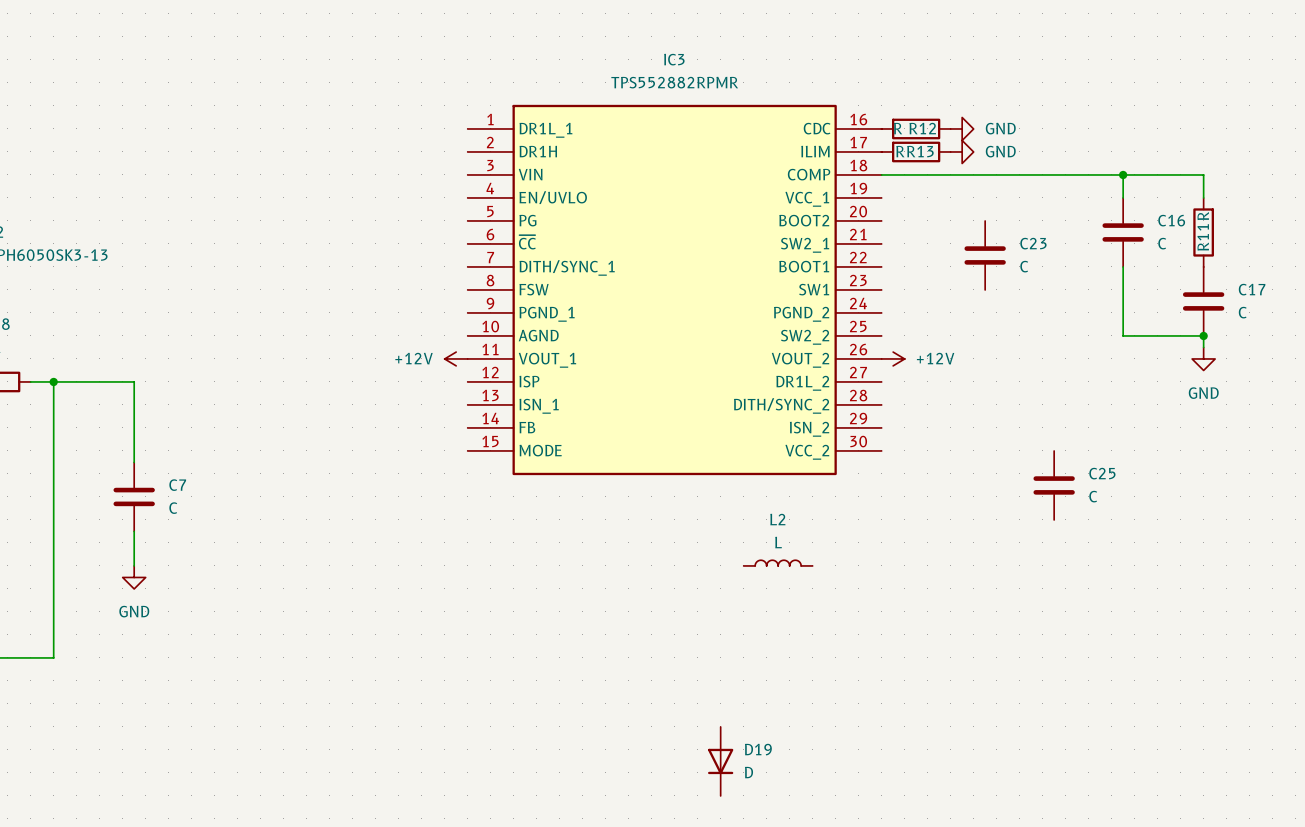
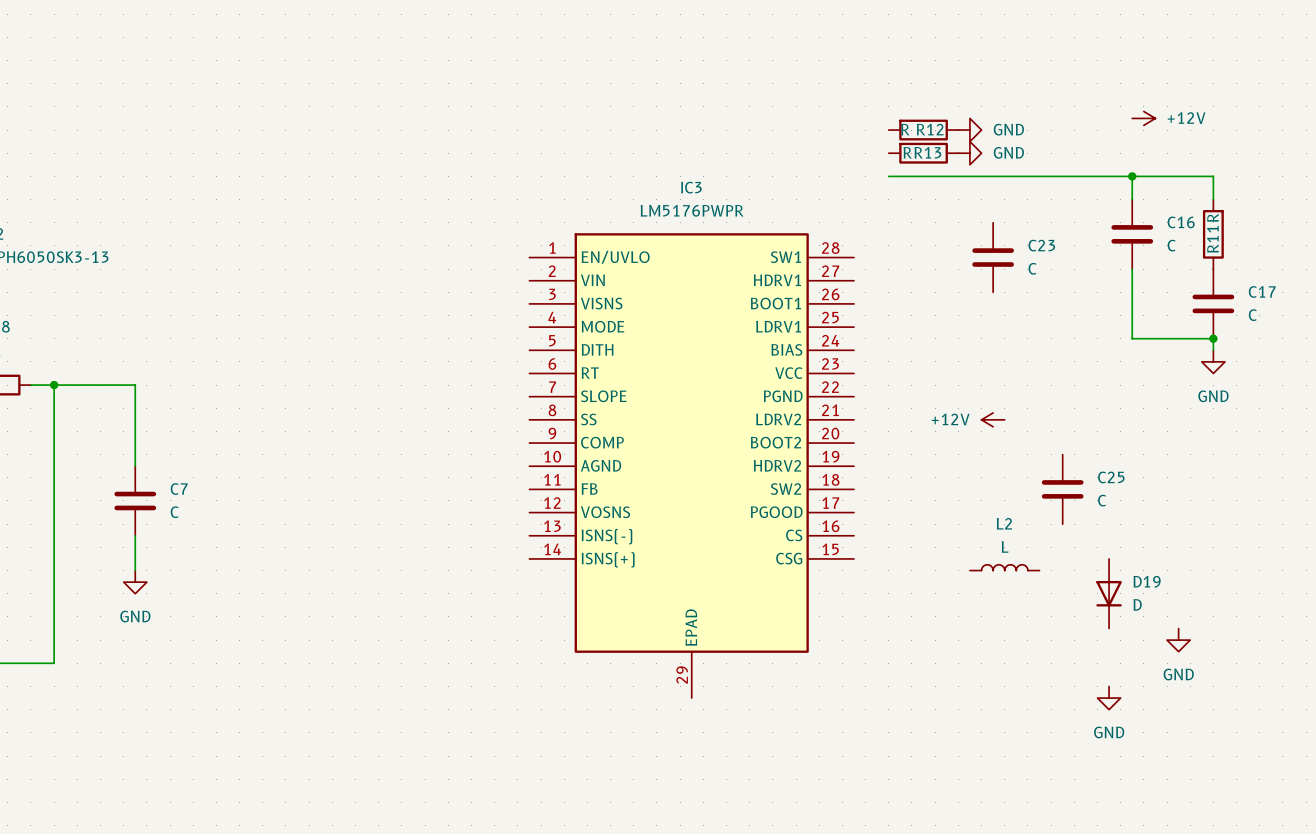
IC3 name position: IC3 (674, 59) -> IC3 (691, 187)
IC3 value: TPS552882RPMR (674, 82) -> LM5176PWPR (692, 210)
IC3 symbol: [467, 104, 882, 476] -> [529, 233, 855, 699]
power symbol: none -> +12V (1143, 118)
power symbol: +12V (456, 358) -> none
power symbol rotation: 0° (893, 358) -> 180° (993, 419)
power symbol position: +12V (893, 358) -> +12V (993, 419)
L2 position: (778, 563) -> (1004, 567)
power symbol: none -> GND (1178, 640)
power symbol: none -> GND (1109, 698)
D19 position: (720, 761) -> (1109, 593)

